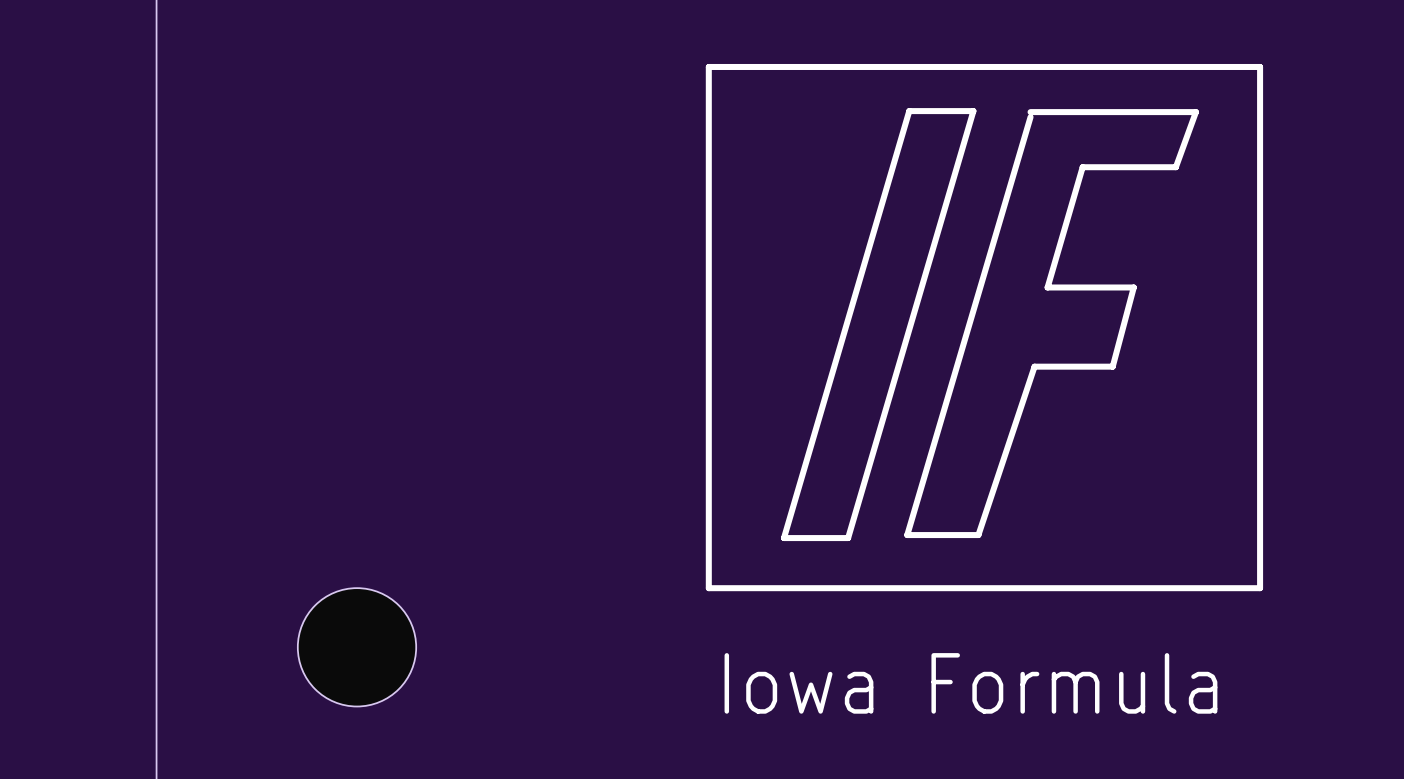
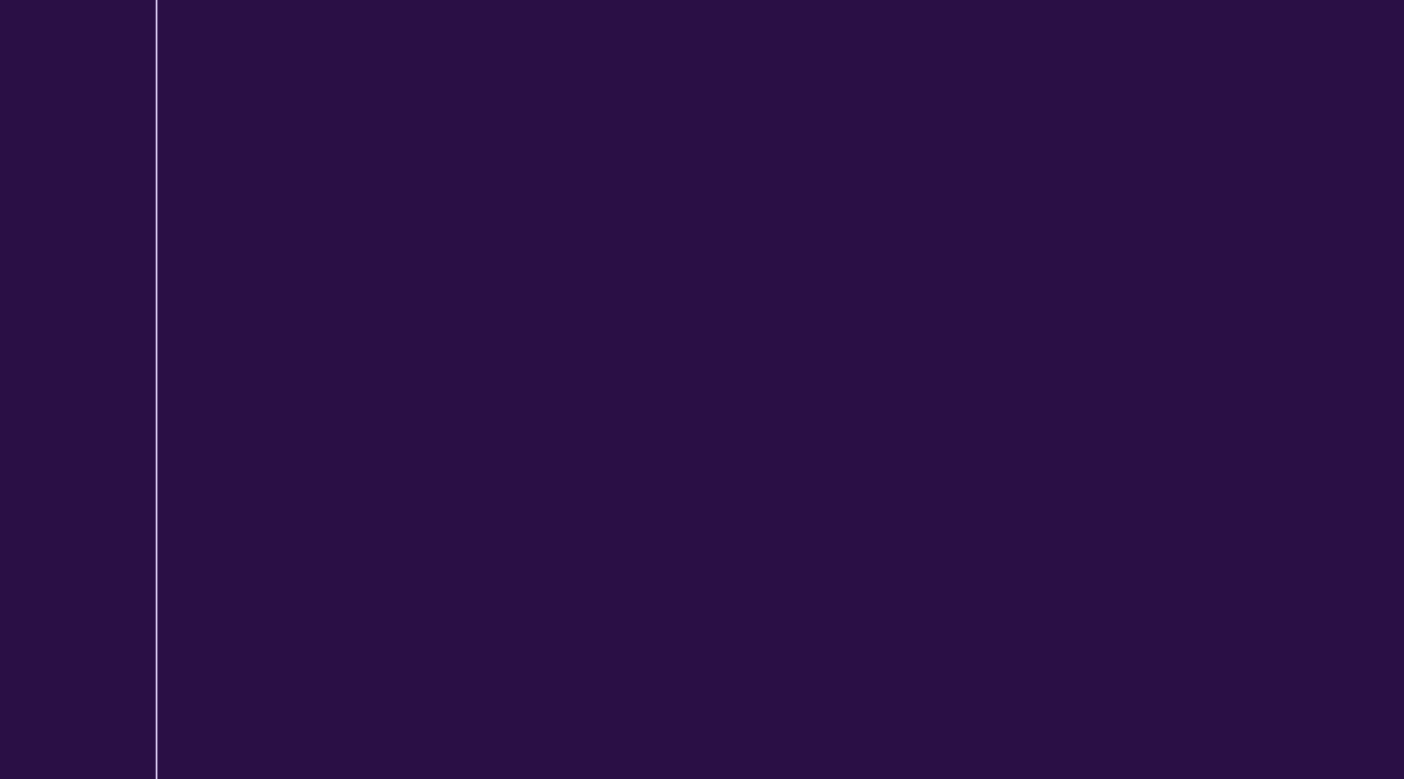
line: (708, 66) (708, 588) (1260, 588) (1260, 66) (708, 66) -> none
line: (909, 111) (783, 538) (848, 538) (973, 111) (909, 111) -> none
line: (1030, 112) (1195, 112) (1175, 167) (1082, 167) (1047, 287) (1133, 287) (1112, 366) (1034, 366) (978, 535) (907, 535) (1030, 117) -> none
hole: (357, 647) -> none
text: Iowa Formula (970, 683) -> none

